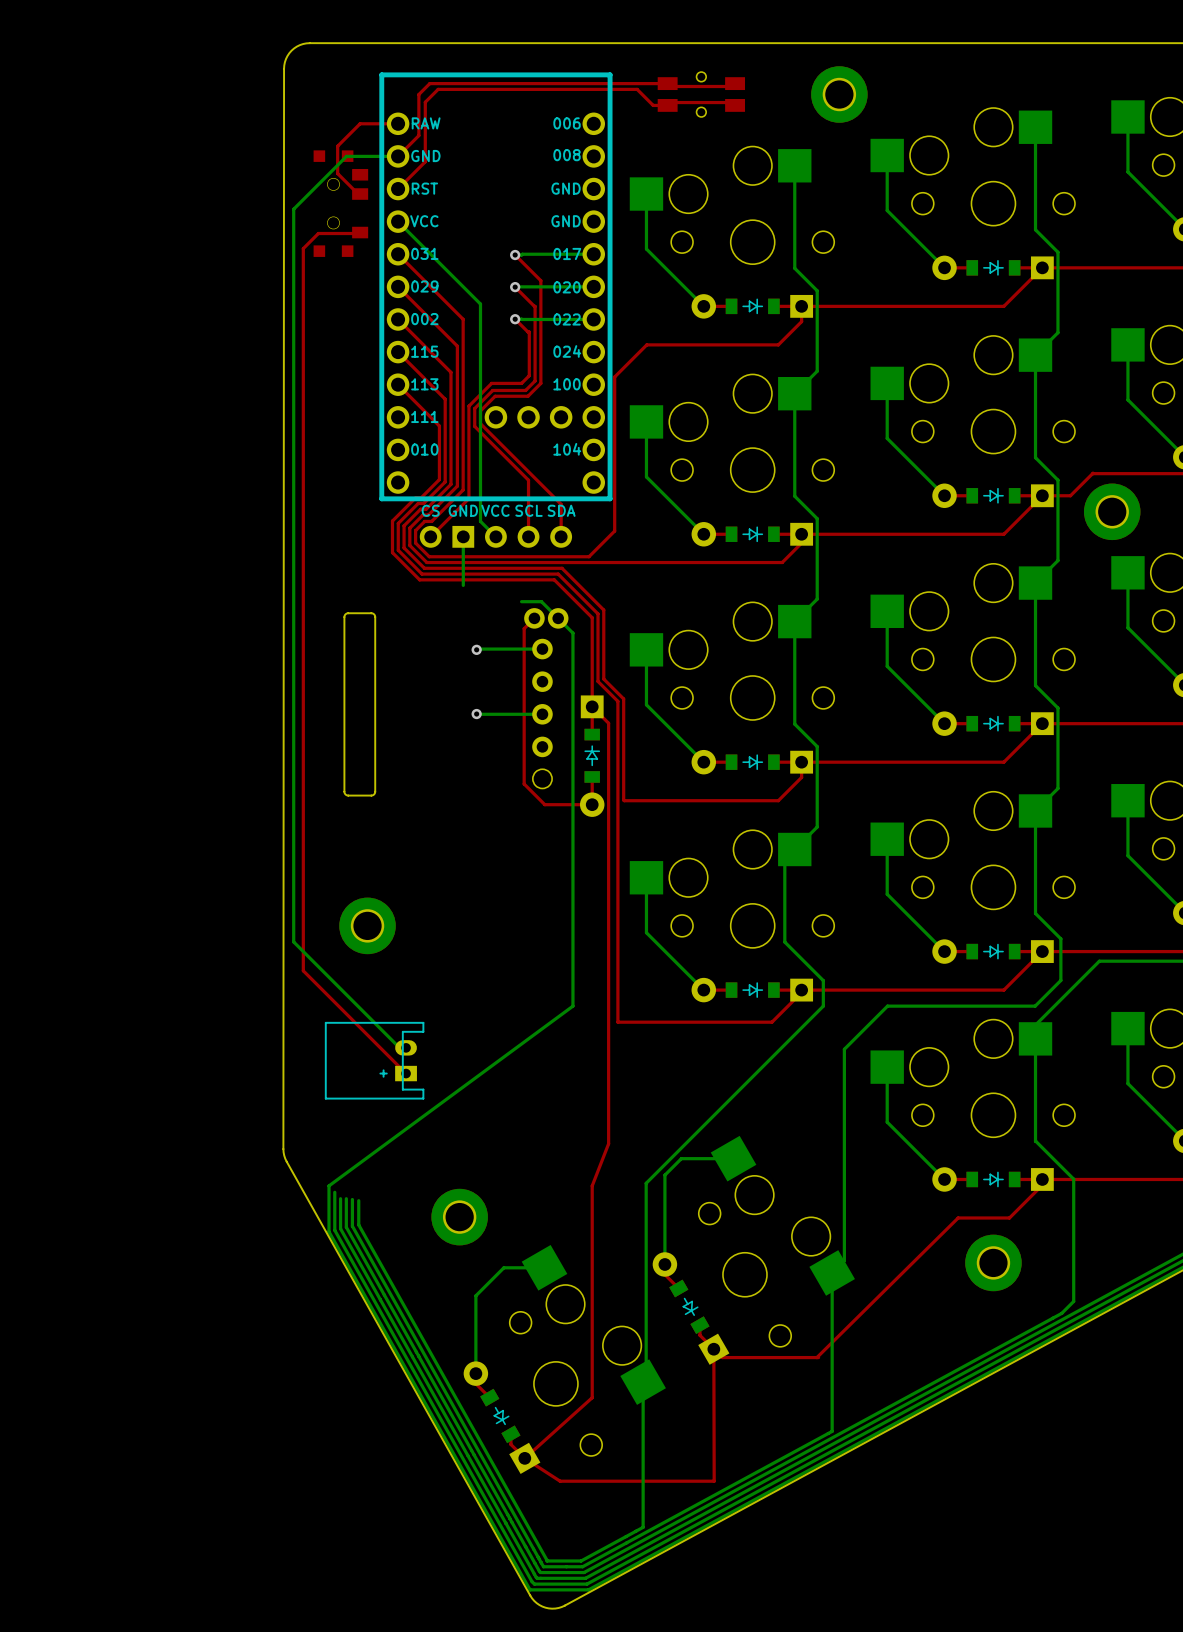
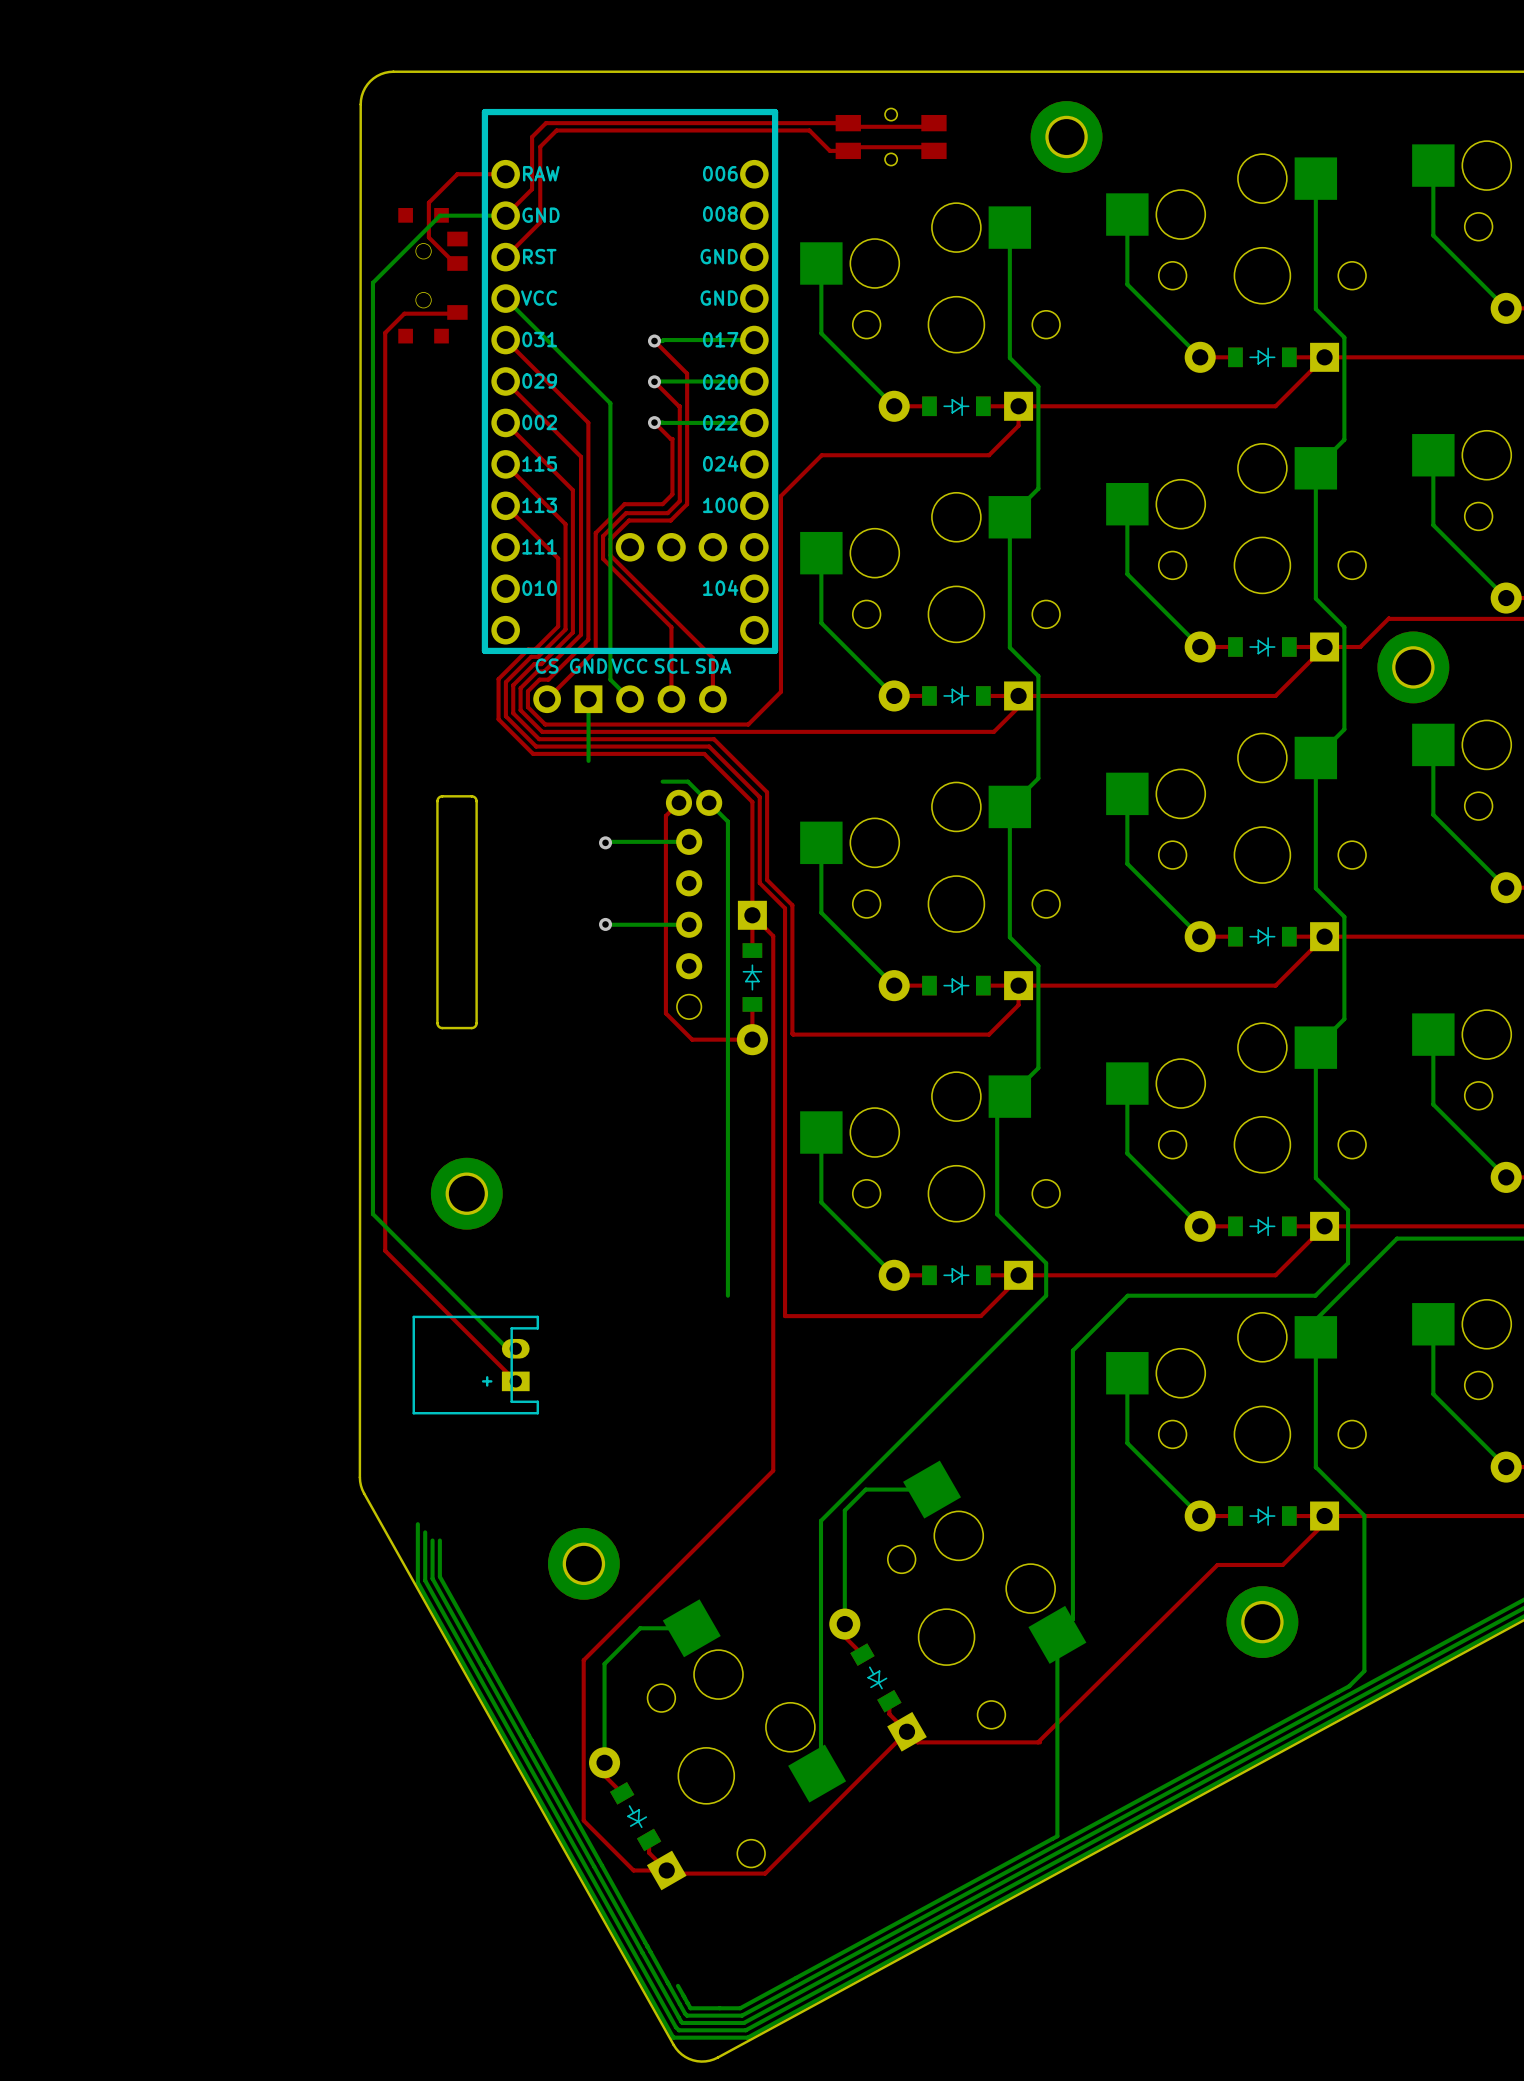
bottom track: (572, 1006) (329, 1185) -> none
top track: (608, 1143) (592, 1185) (592, 1397) (524, 1458) (560, 1481) (714, 1481) (713, 1349) -> (773, 1470) (583, 1660) (583, 1820) (633, 1870) (666, 1870)
bottom track: (352, 1199) (352, 1226) (533, 1549) -> none
bottom track: (358, 1200) (358, 1224) (547, 1560) (581, 1560) (643, 1527) (643, 1382) -> none
top track: none -> (906, 1731) (765, 1873) (669, 1873)

